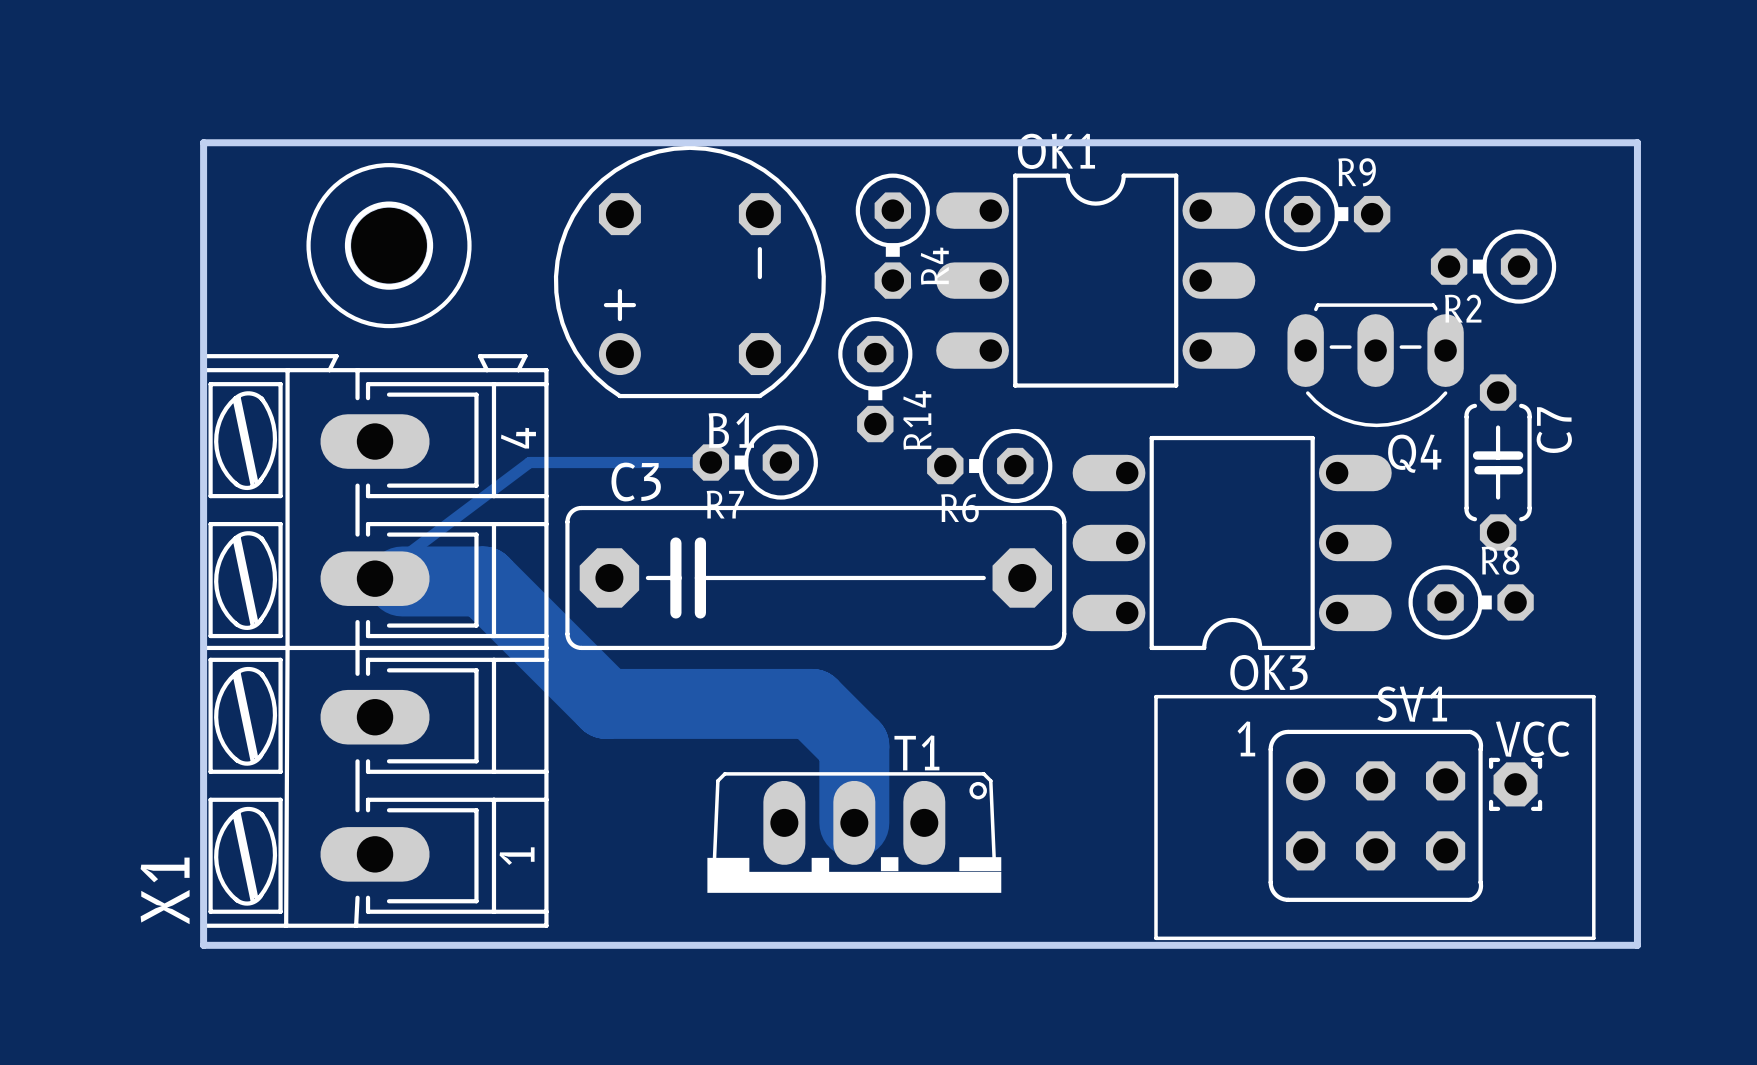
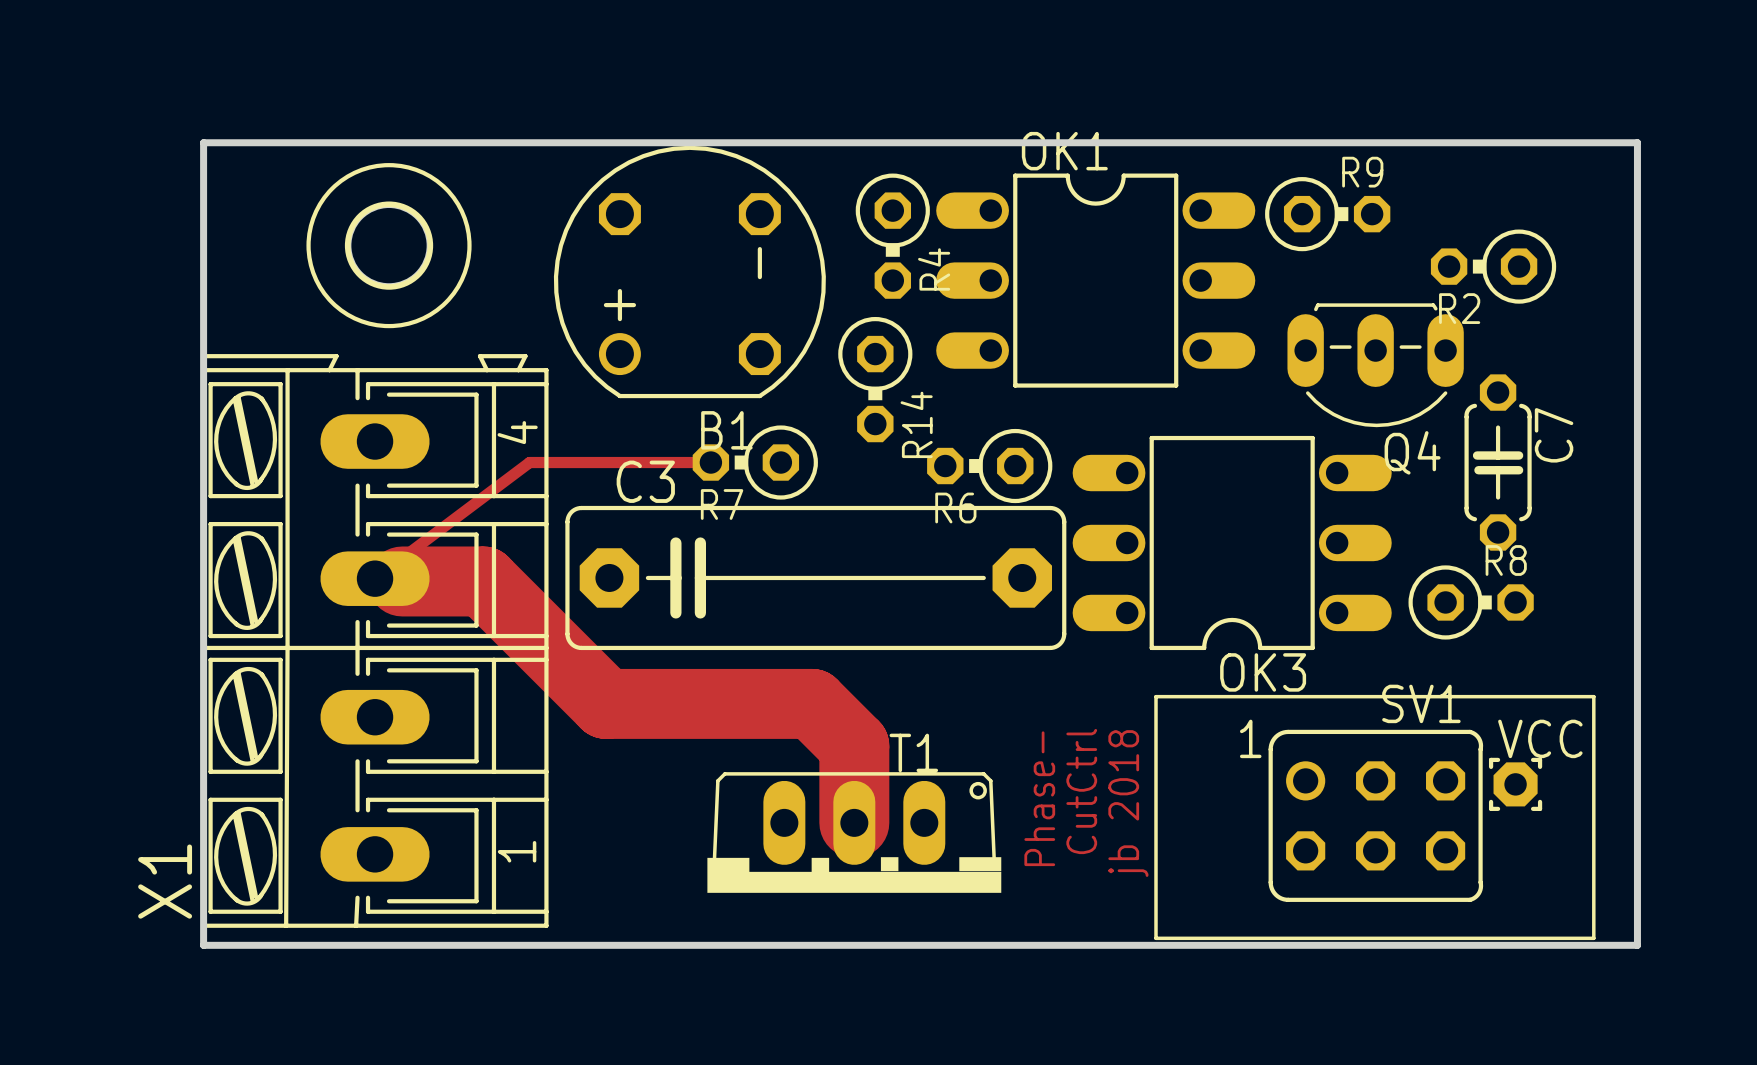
text: none -> Phase- (1039, 798)
text: none -> CutCtrl (1081, 791)
text: none -> jb 2018 (1128, 803)

